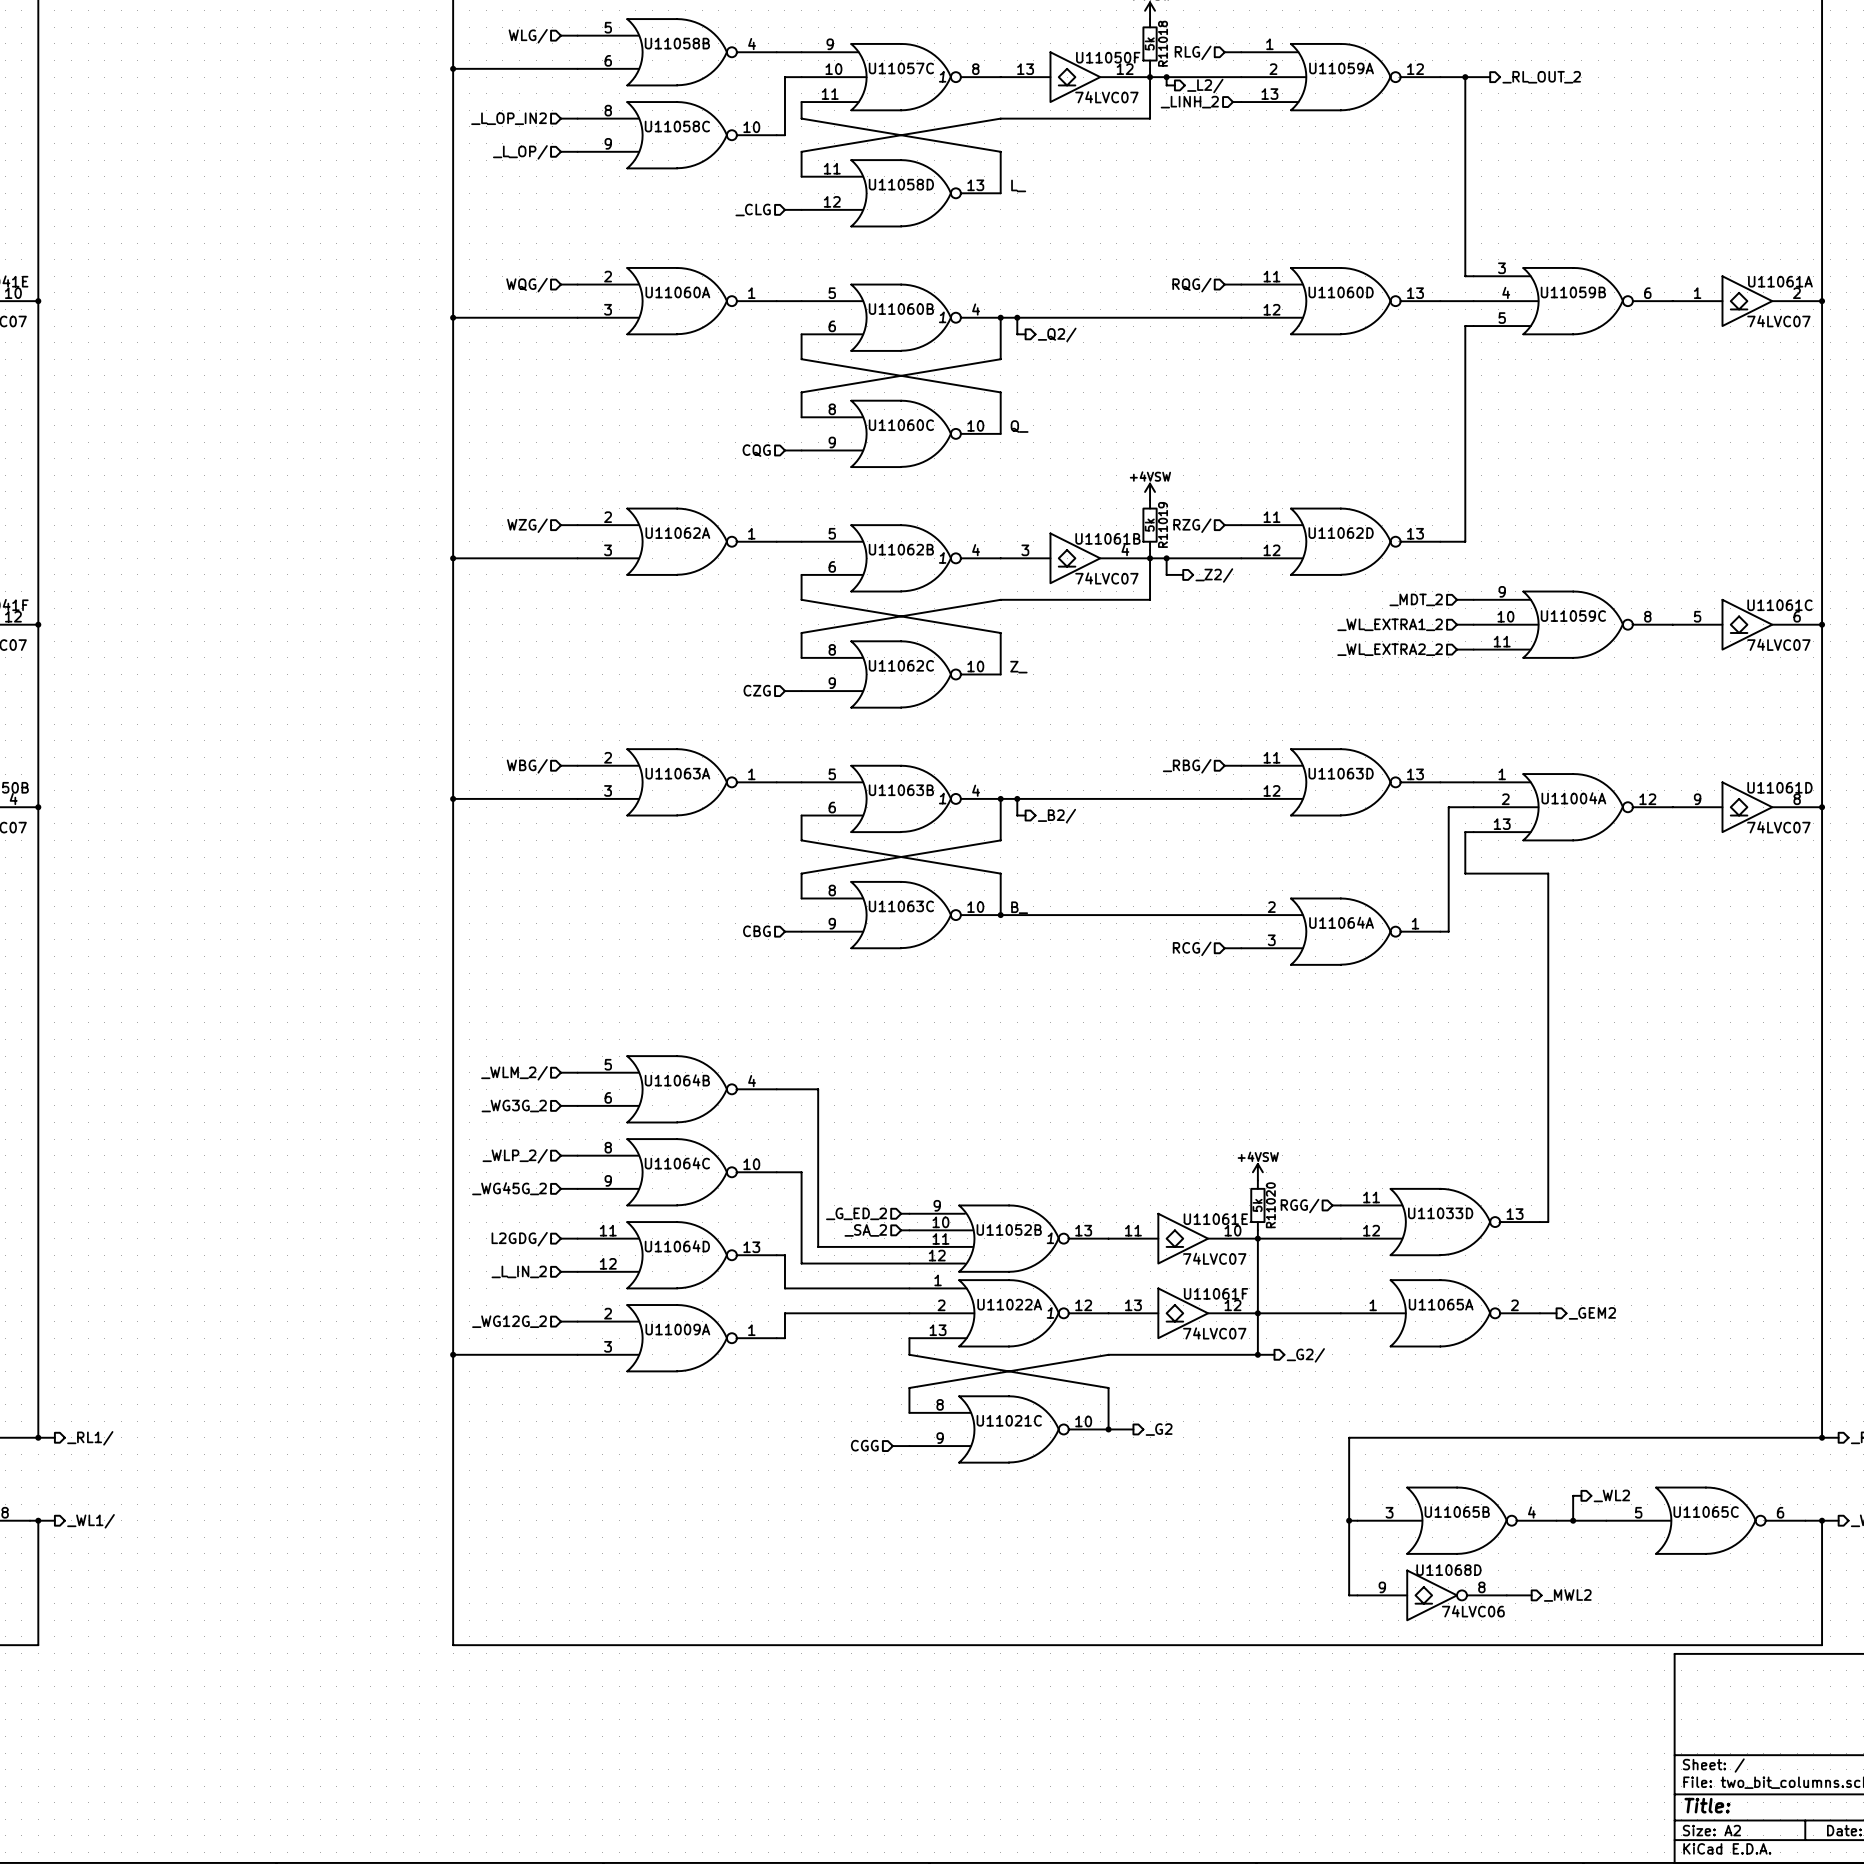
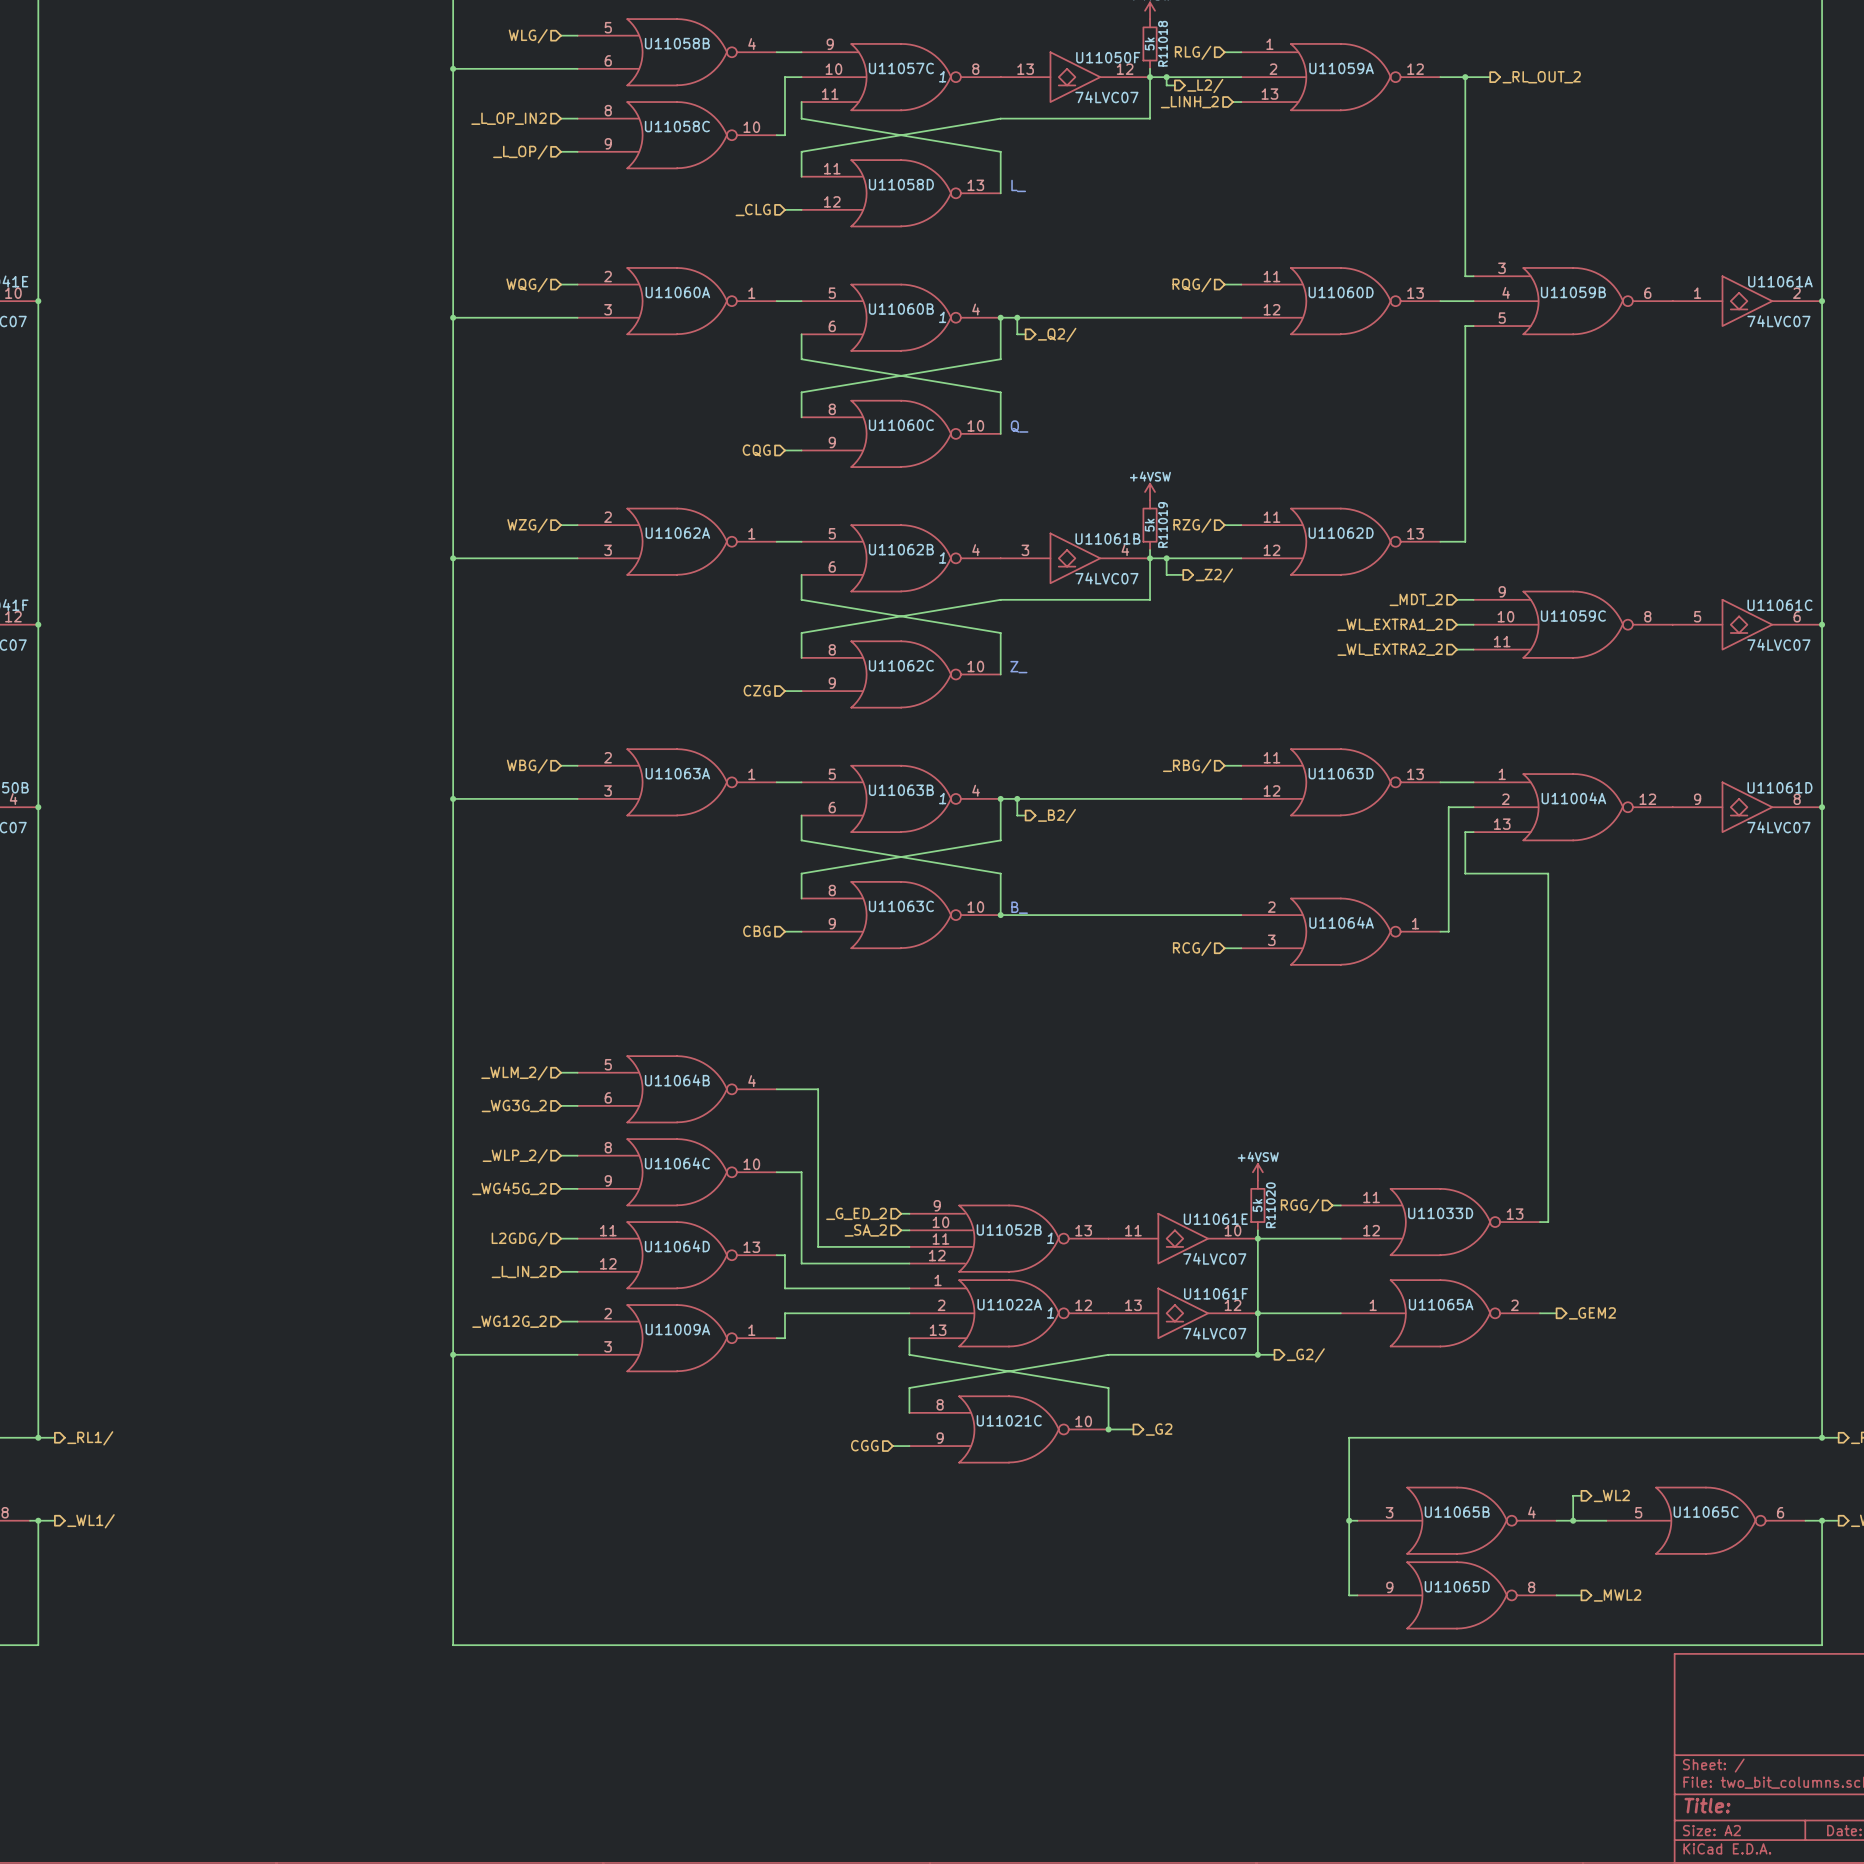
U11068D: 74LVC06 (1432, 1595) -> none
U11065D: none -> (1457, 1595)
hierarchical label position: _MWL2 (1567, 1595) -> _MWL2 (1617, 1595)

